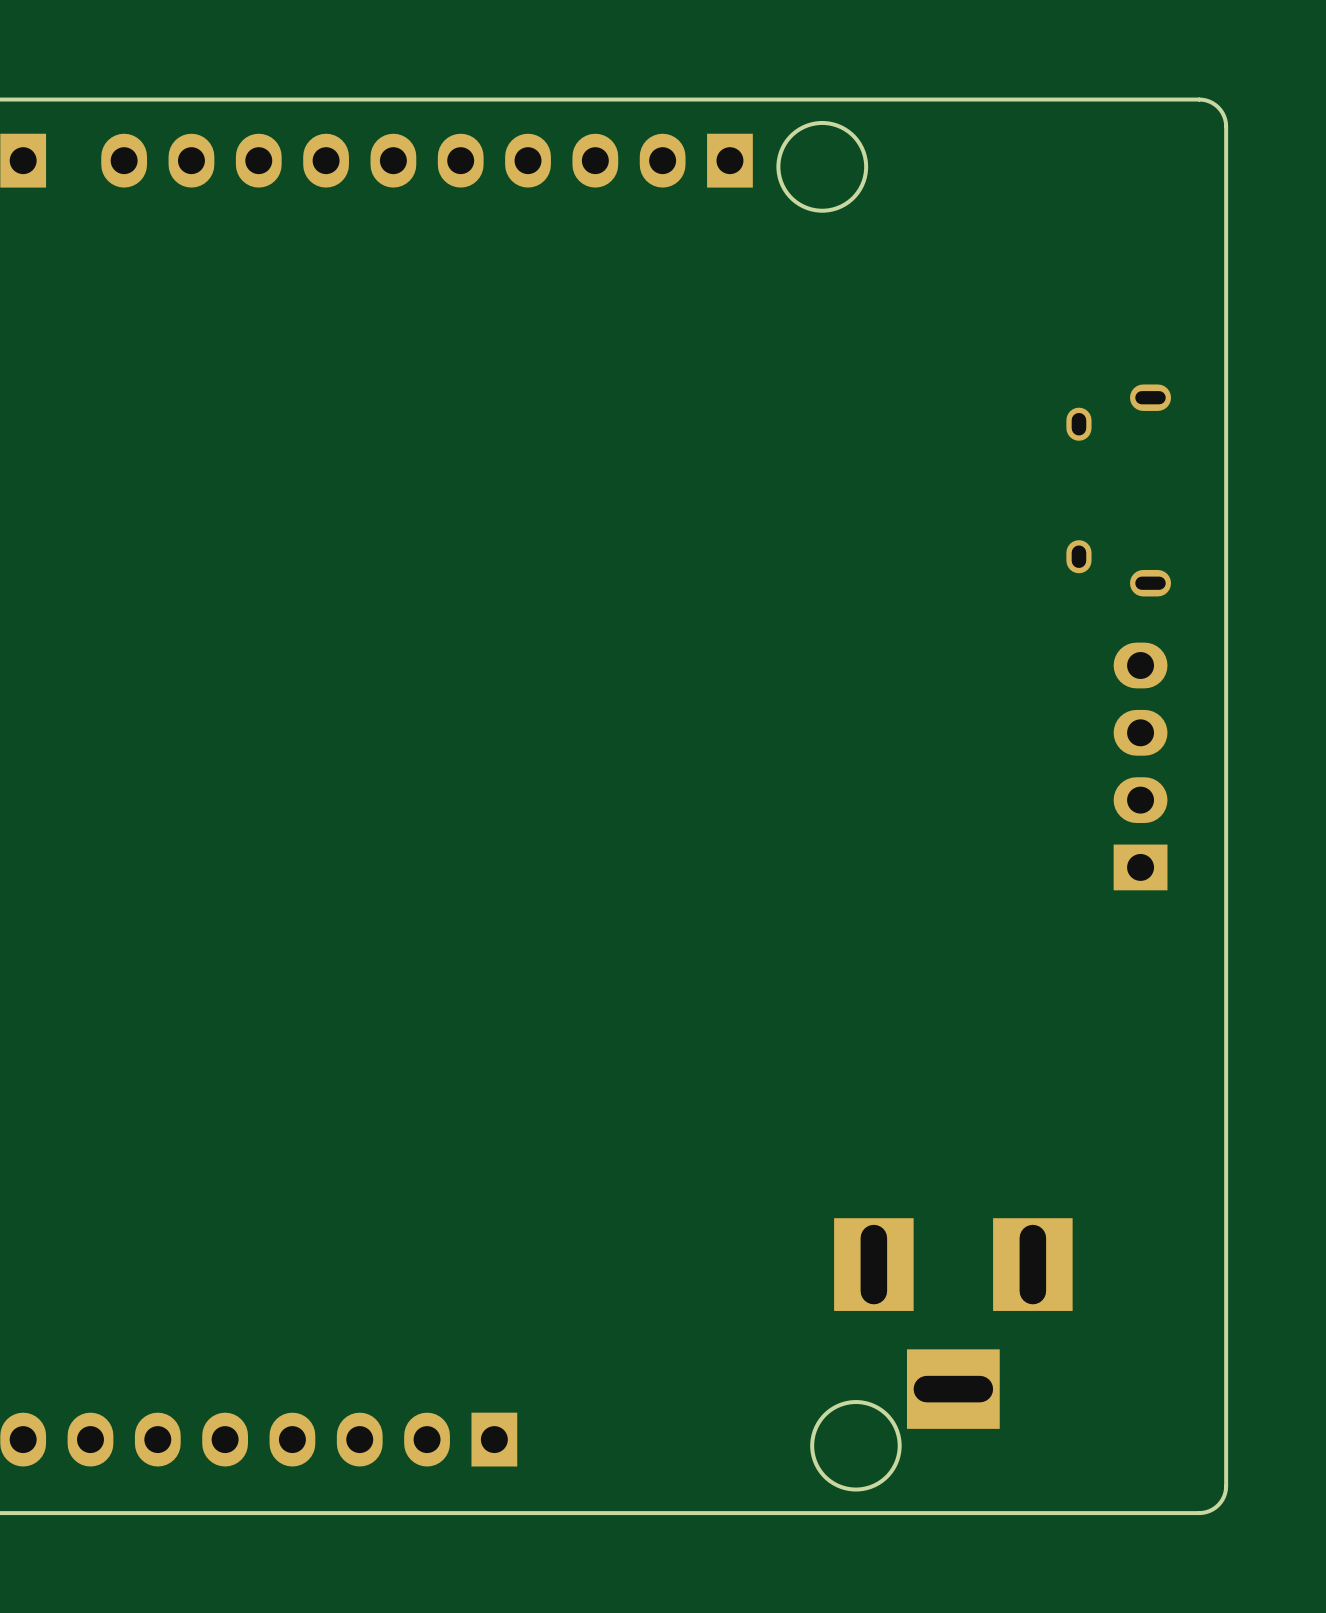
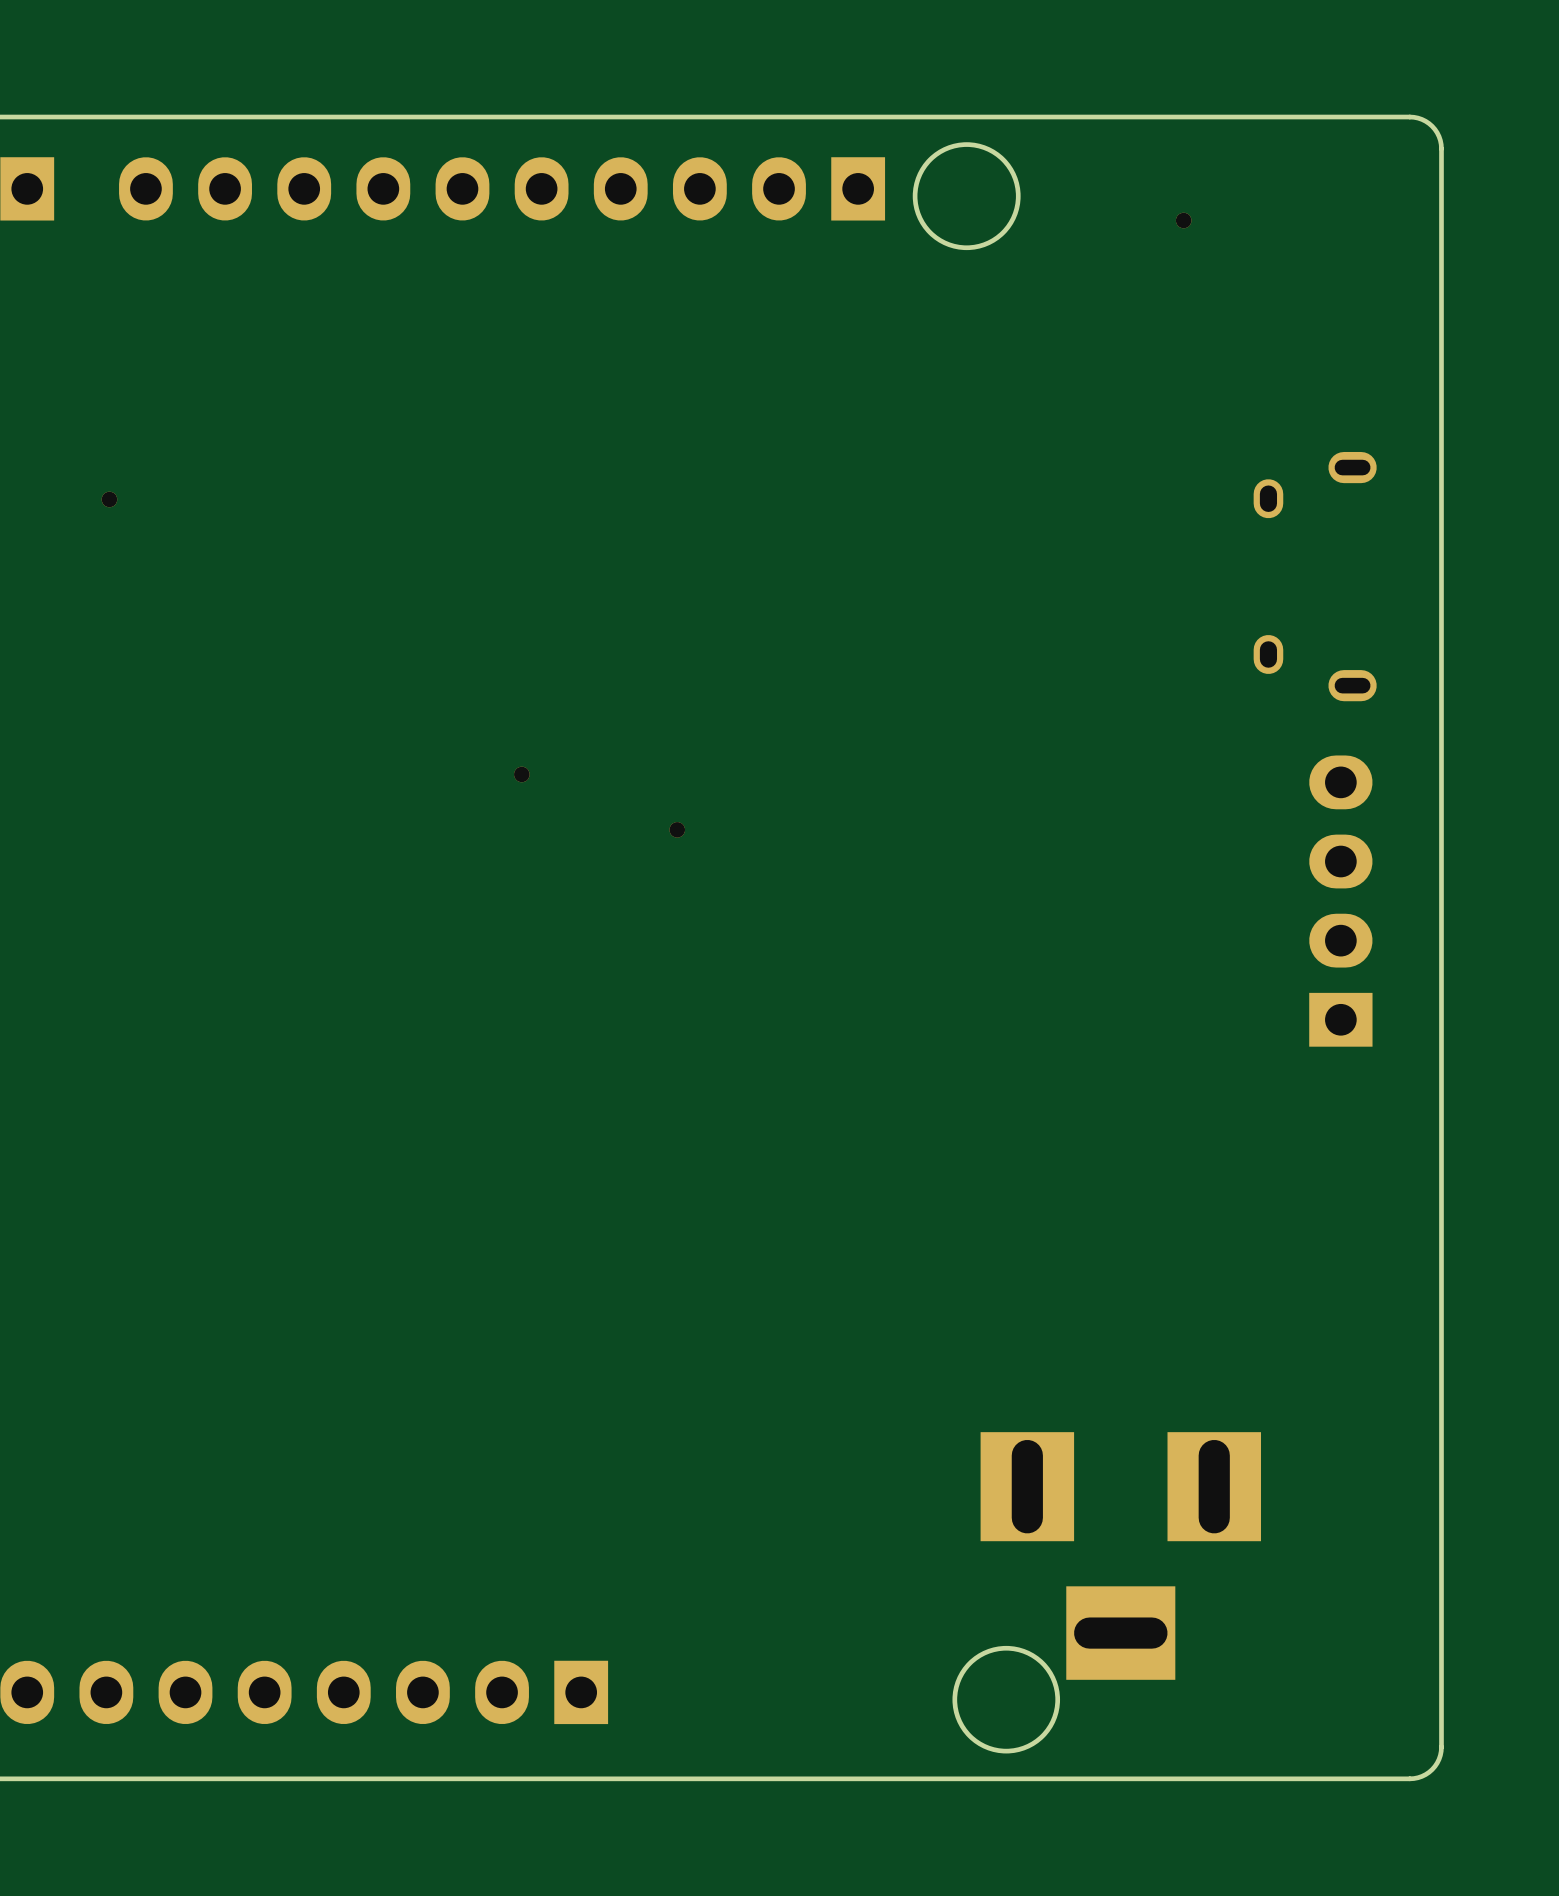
part: none -> (1183, 220)
part: none -> (109, 499)
part: none -> (521, 774)
part: none -> (677, 829)

